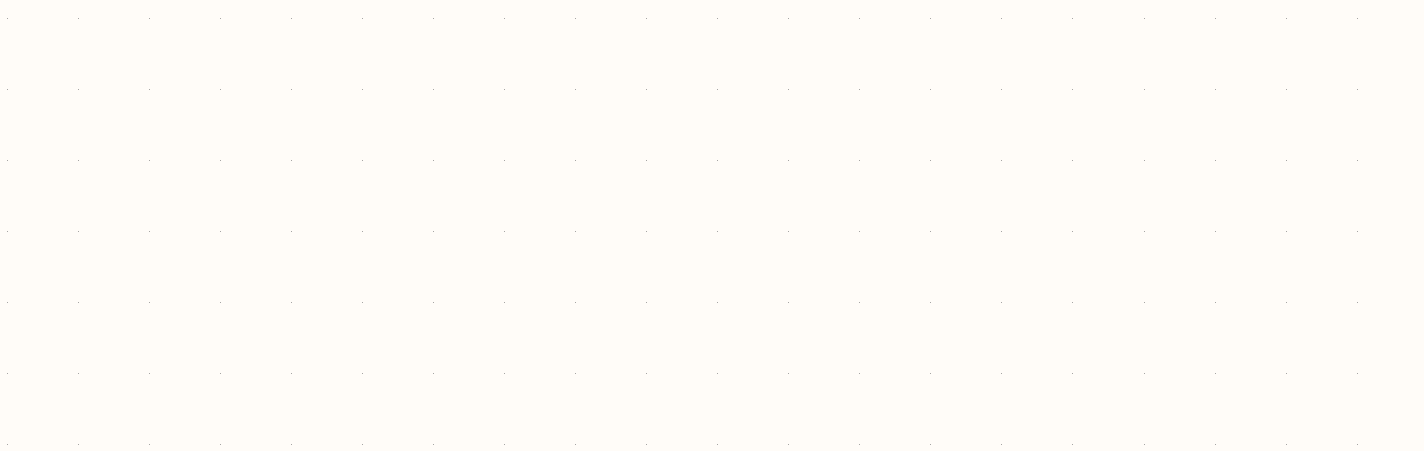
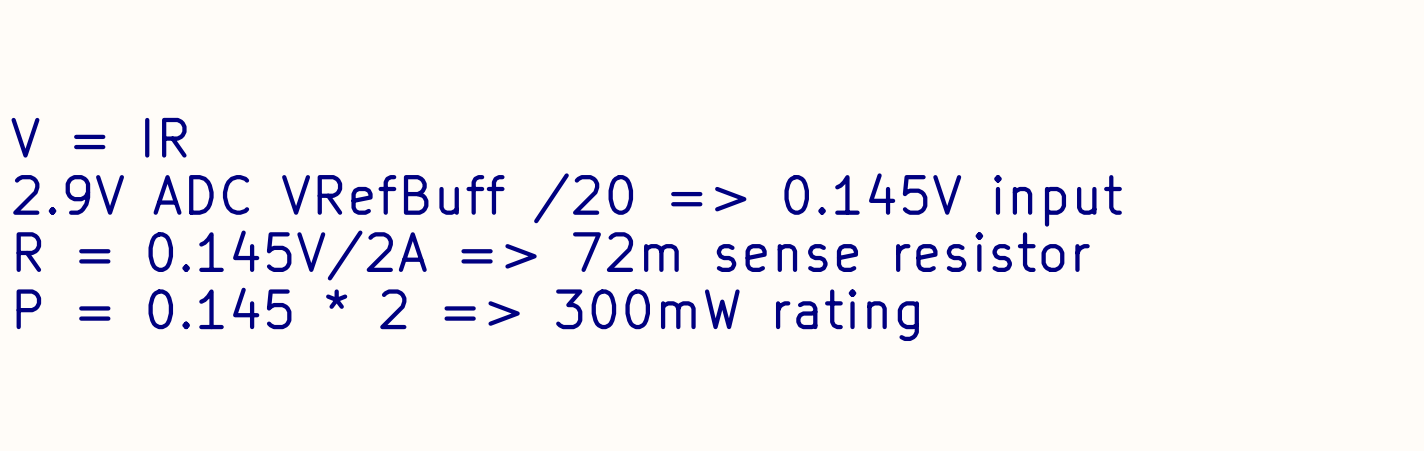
text: none -> V = IR (99, 137)
text: none -> 2.9V ADC VRefBuff /20 => 0.145V input (567, 200)
text: none -> R = 0.145V/2A => 72m sense resistor (553, 255)
text: none -> P = 0.145 * 2 => 300mW rating (467, 314)

